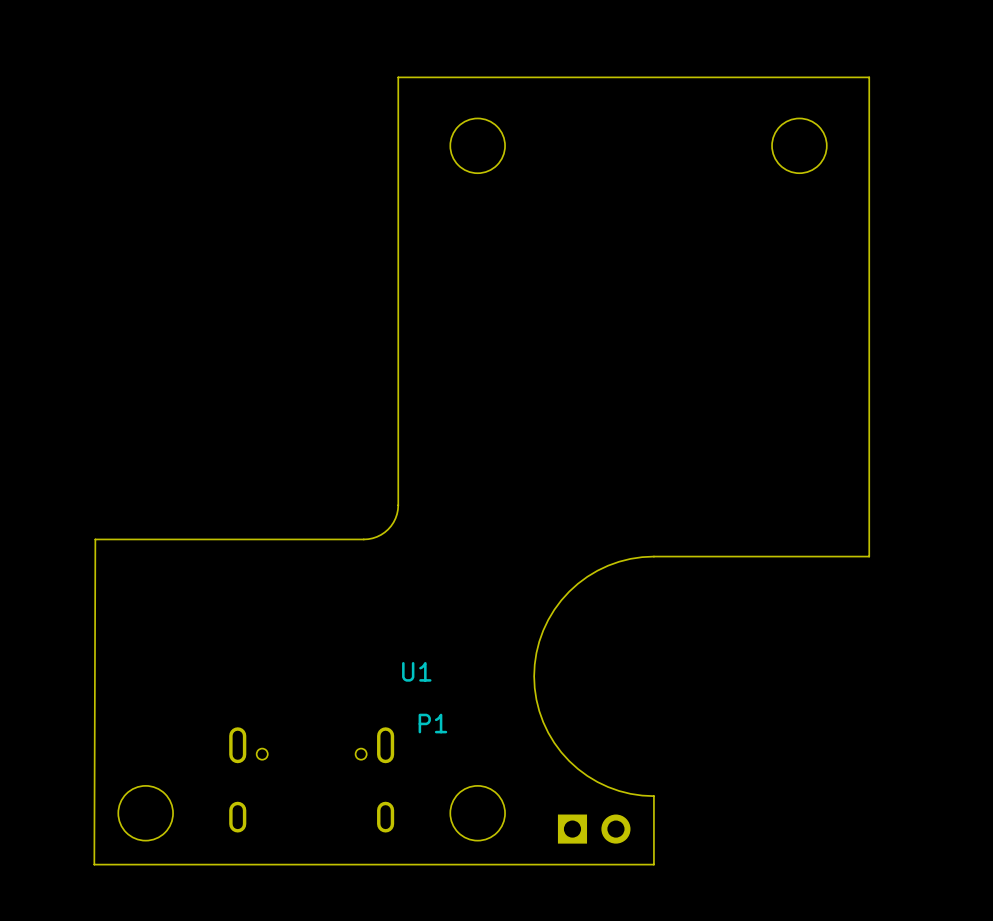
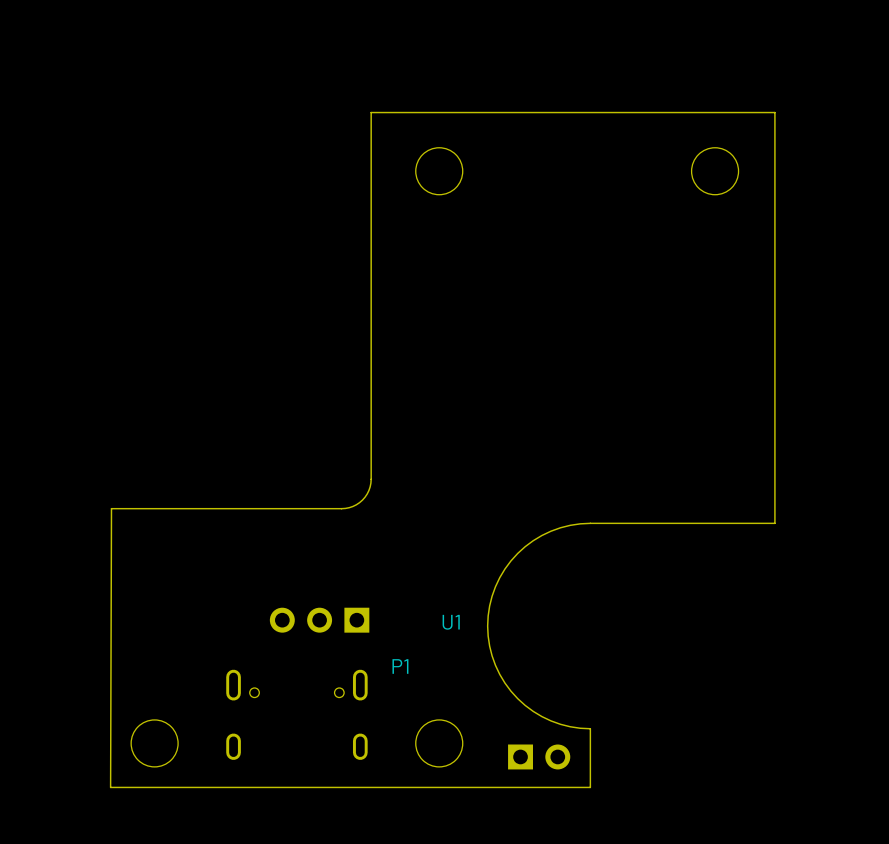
part: none -> (319, 620)
U1 position: (416, 671) -> (451, 622)

